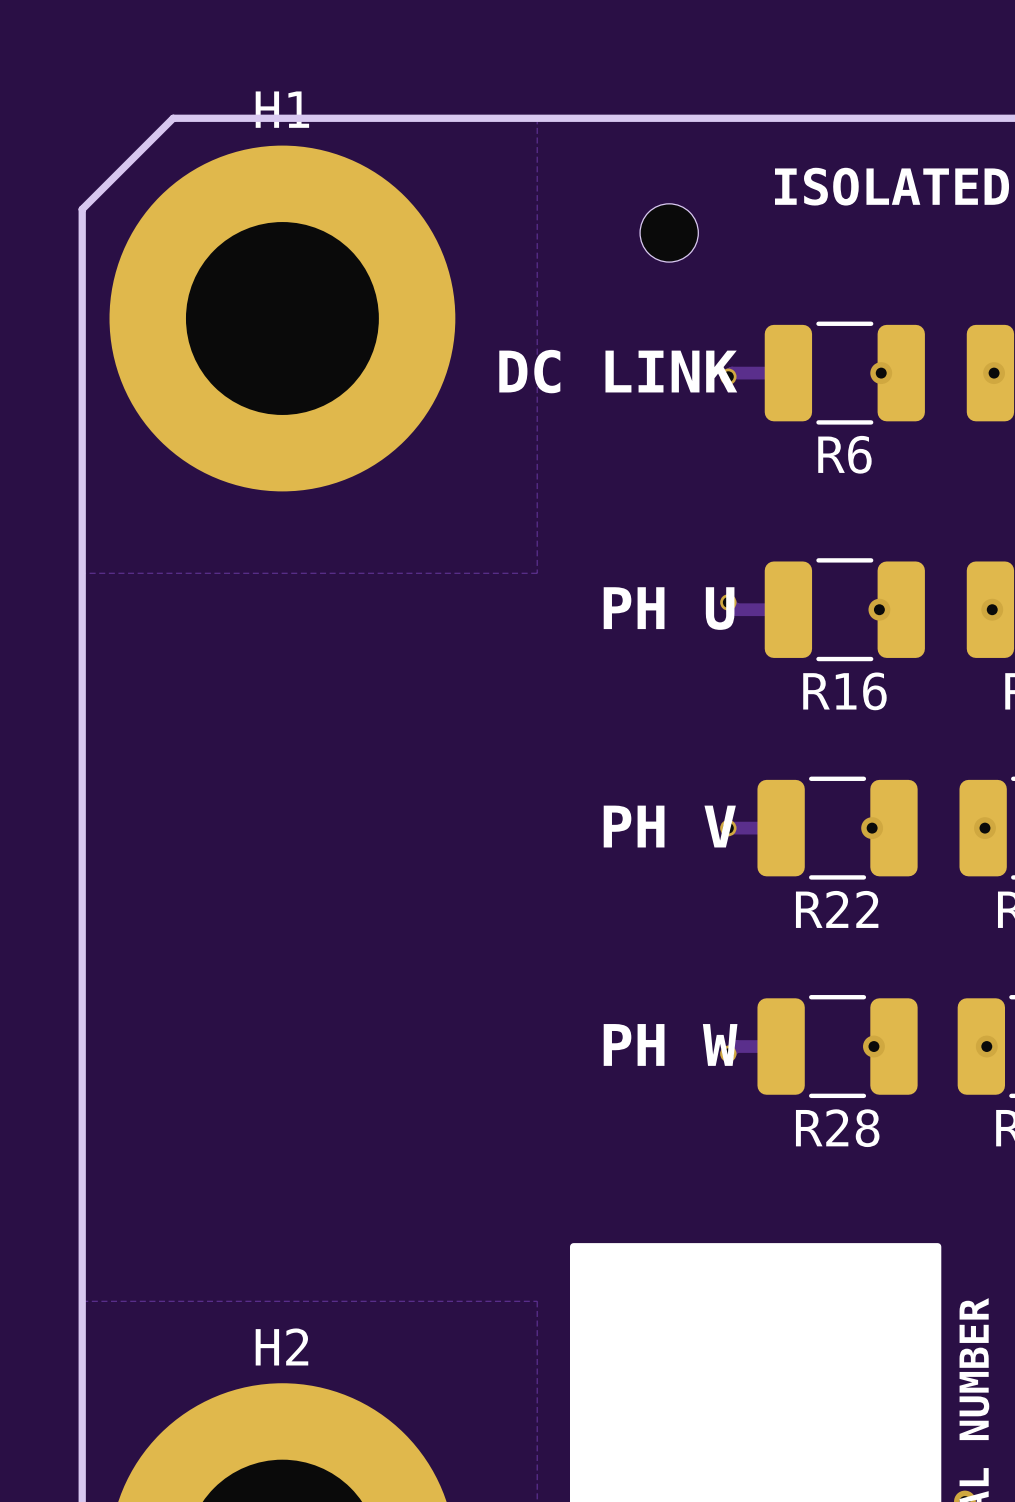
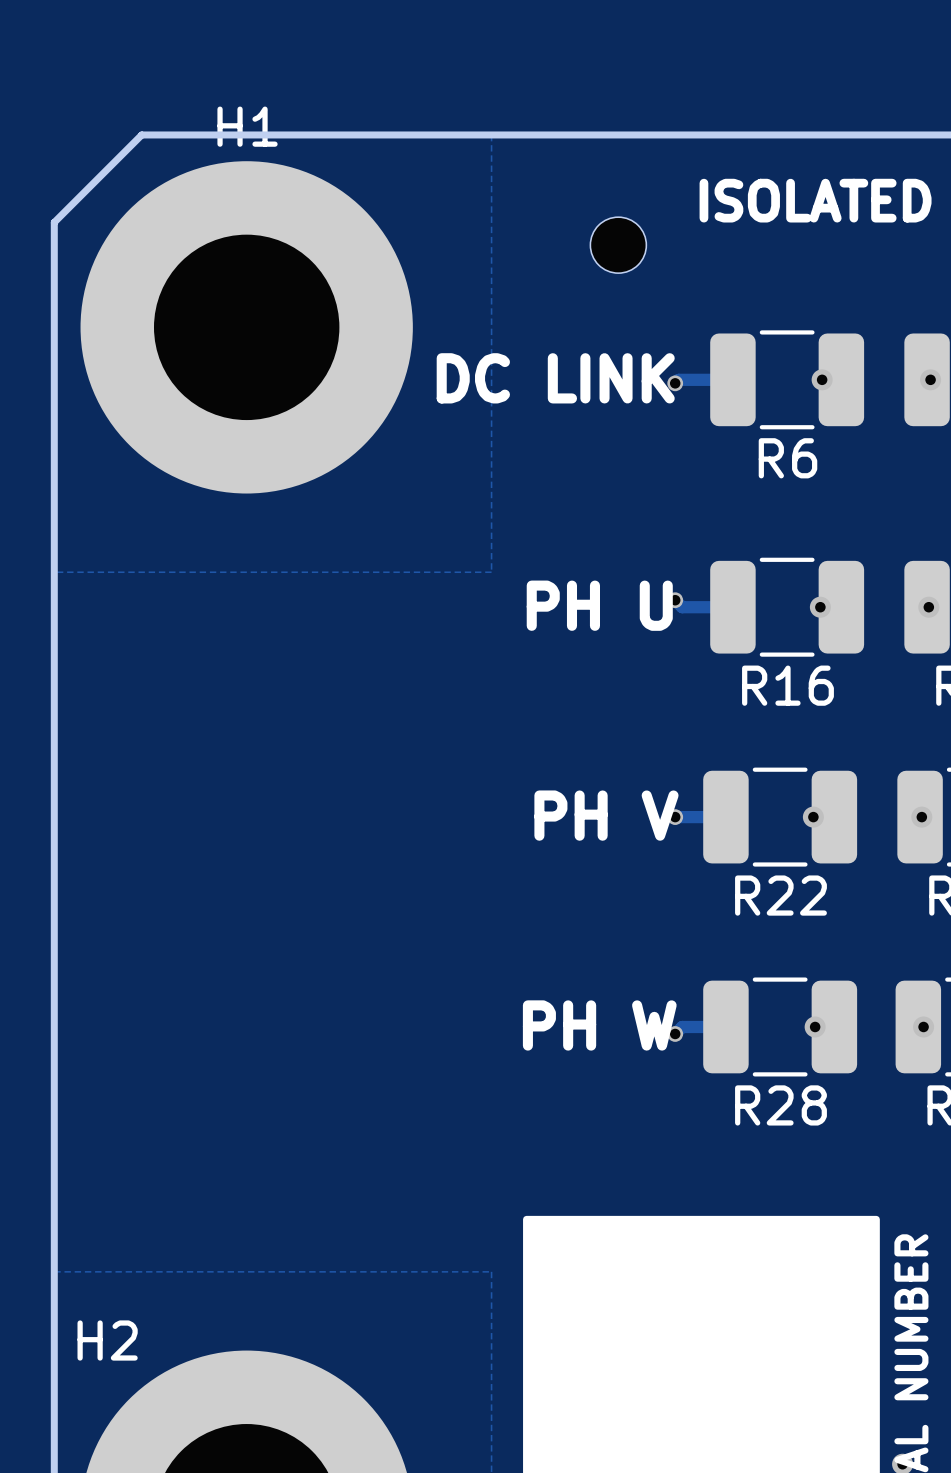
H2 name position: H2 (281, 1346) -> H2 (107, 1340)

